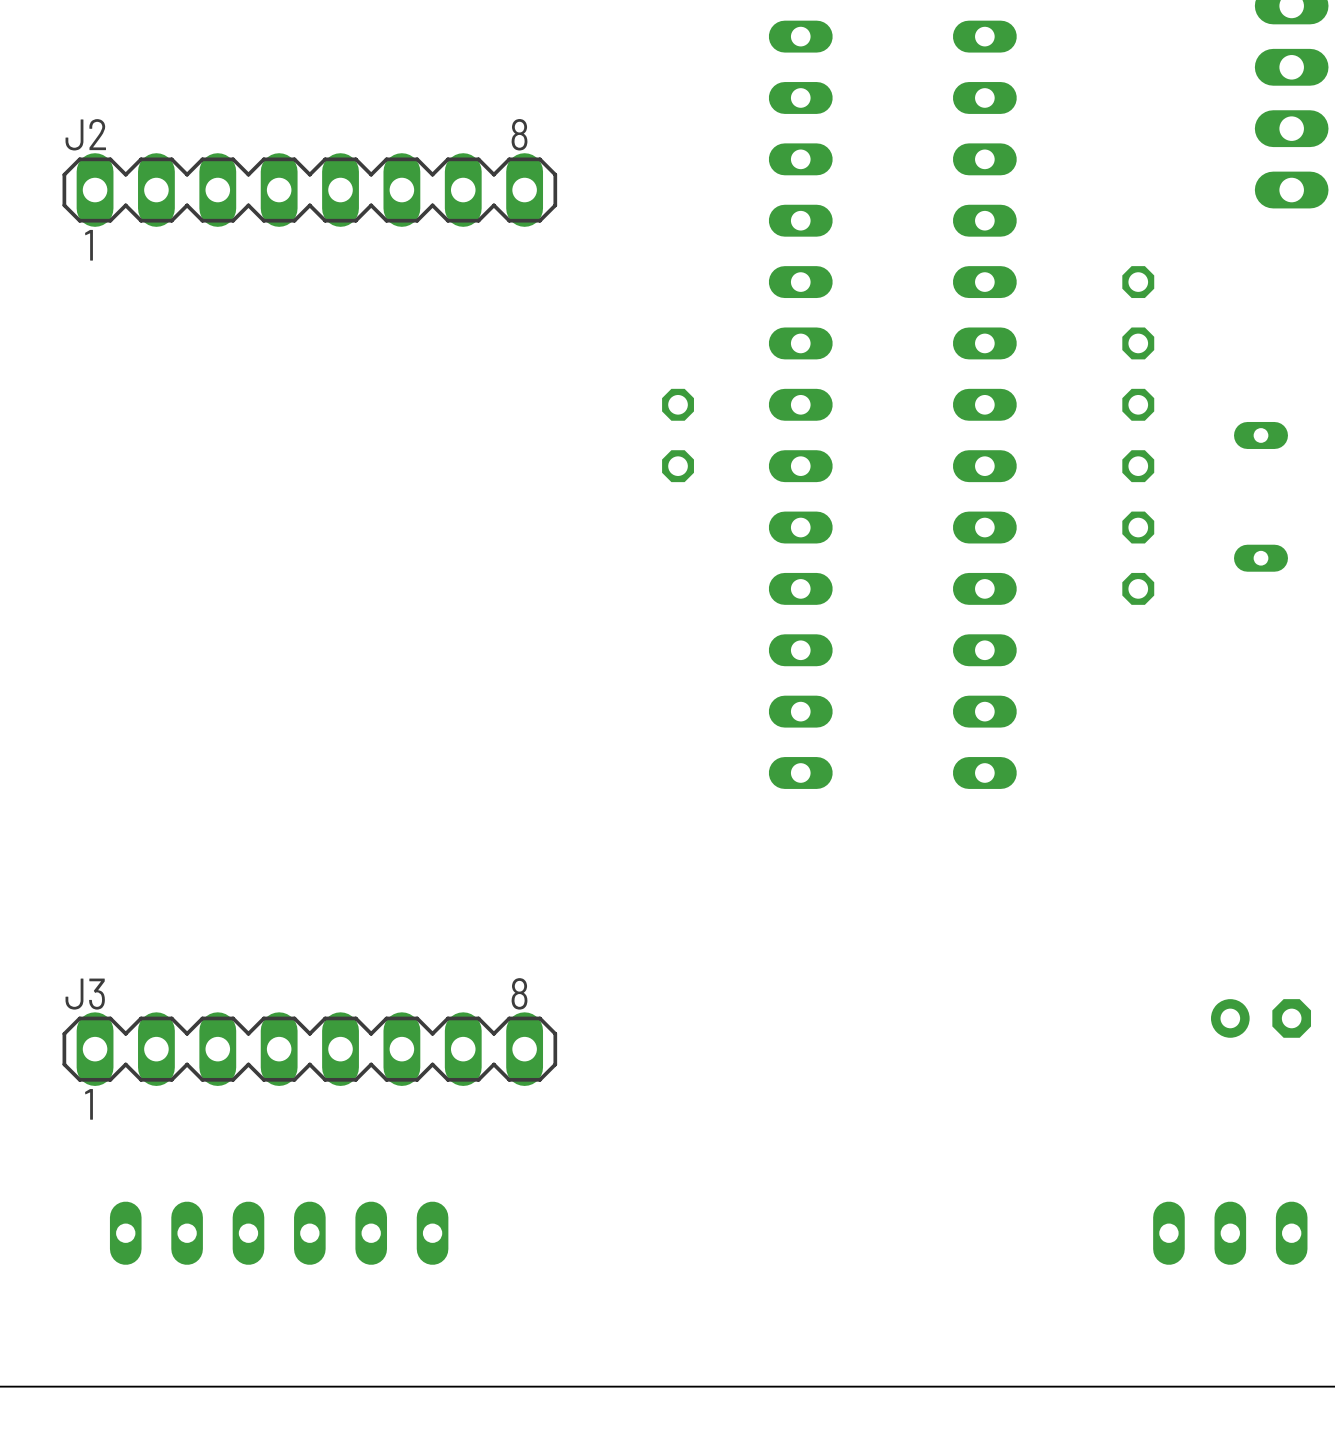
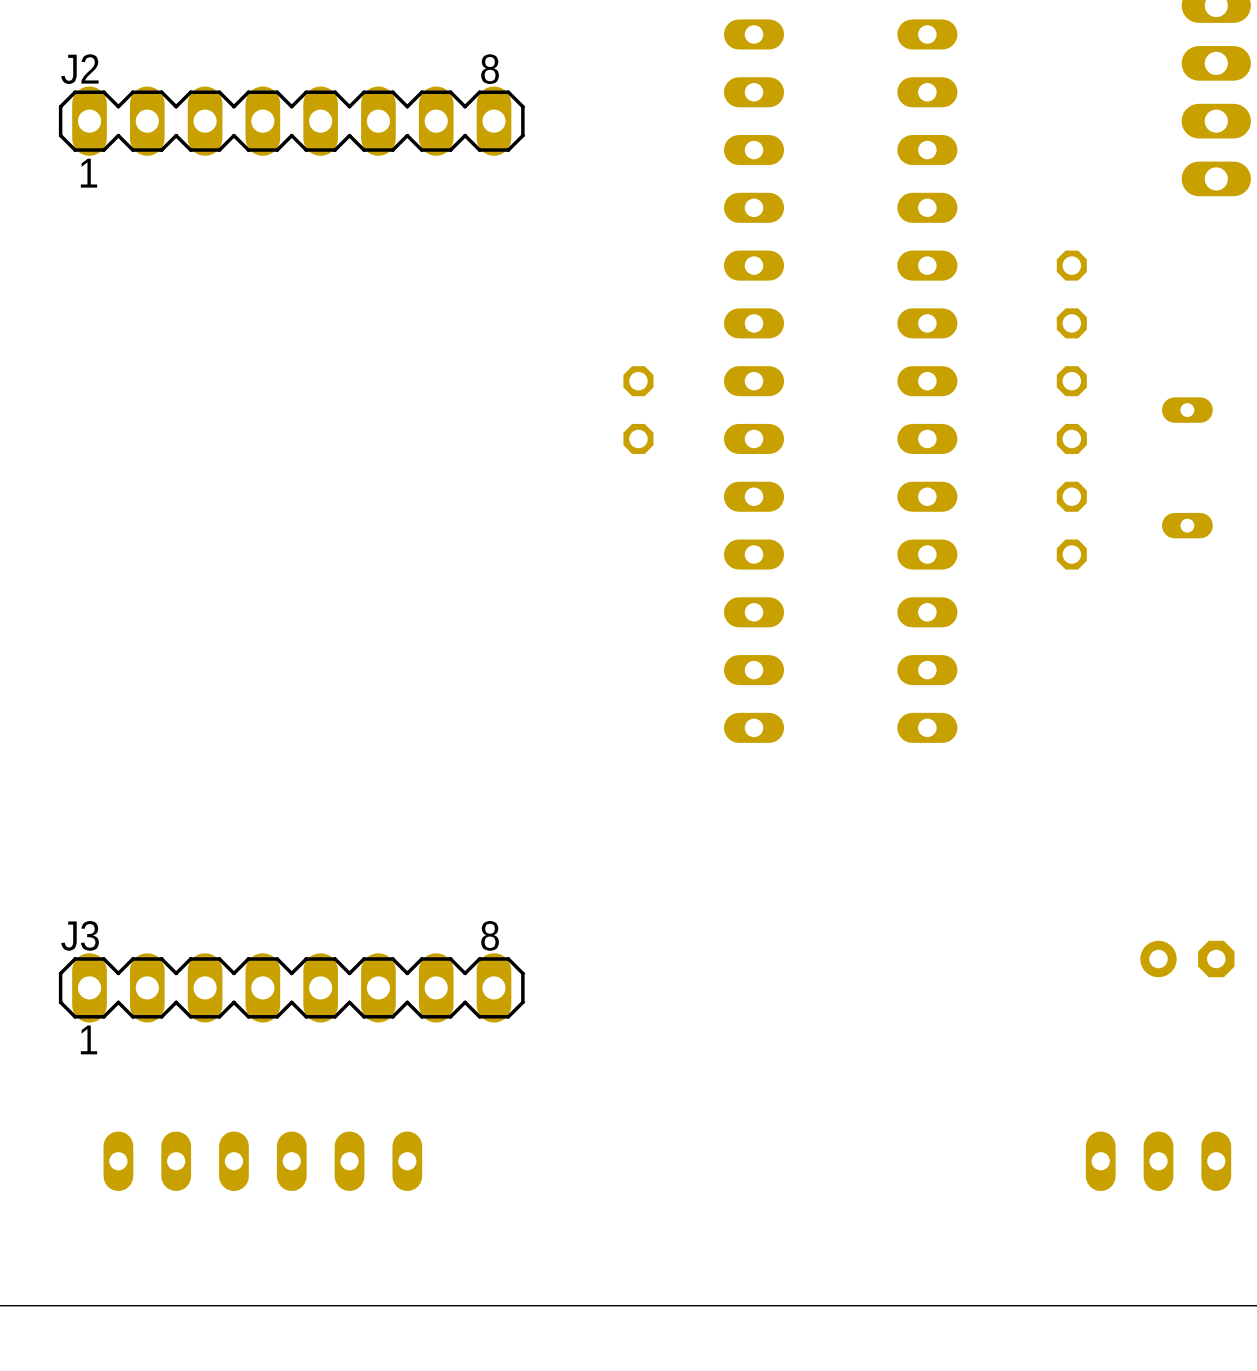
J2 position: (309, 190) -> (291, 121)

